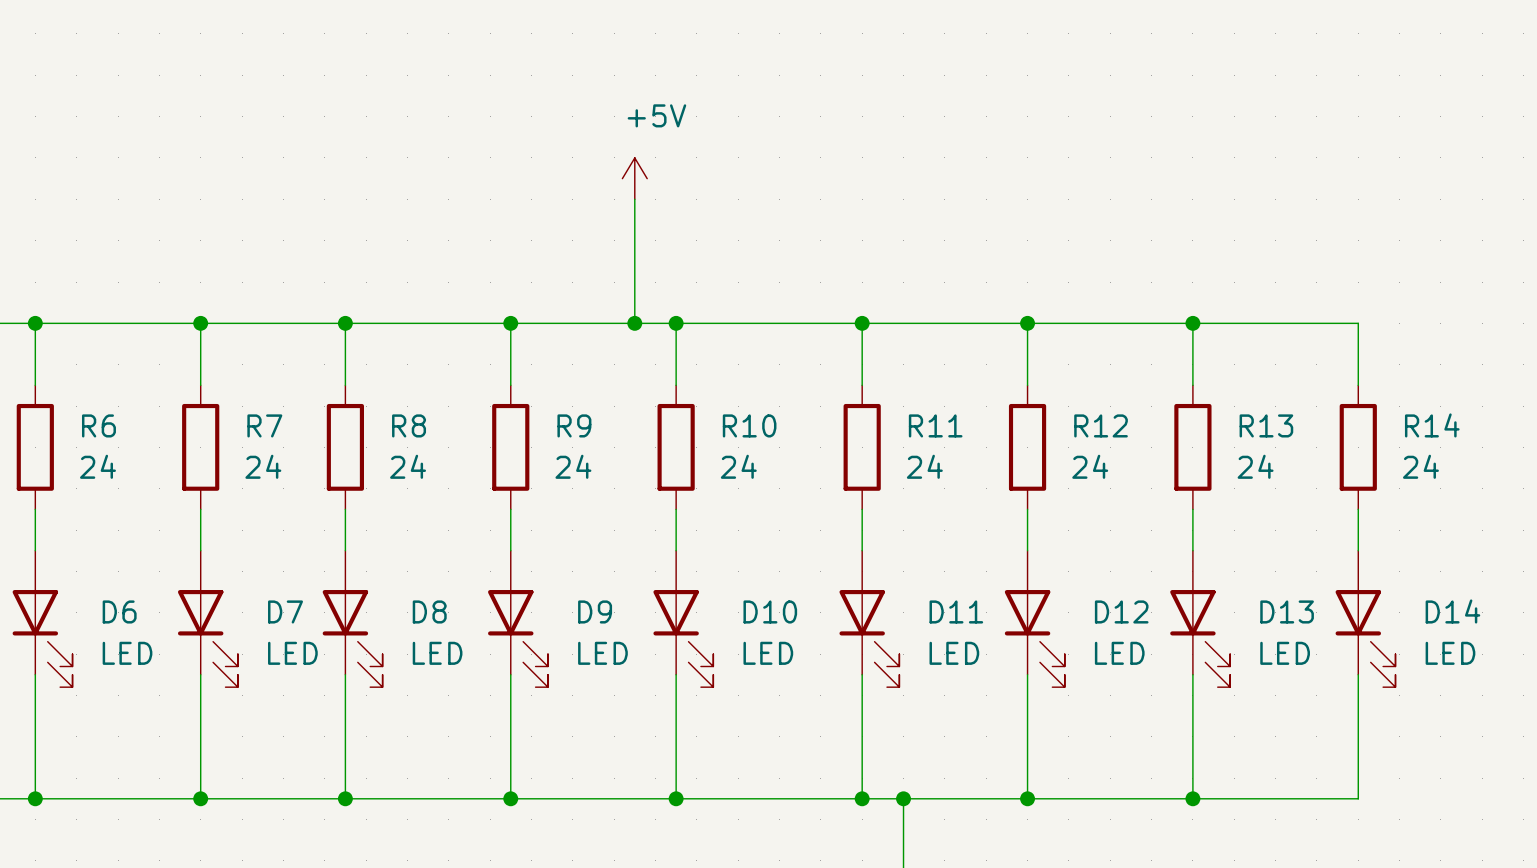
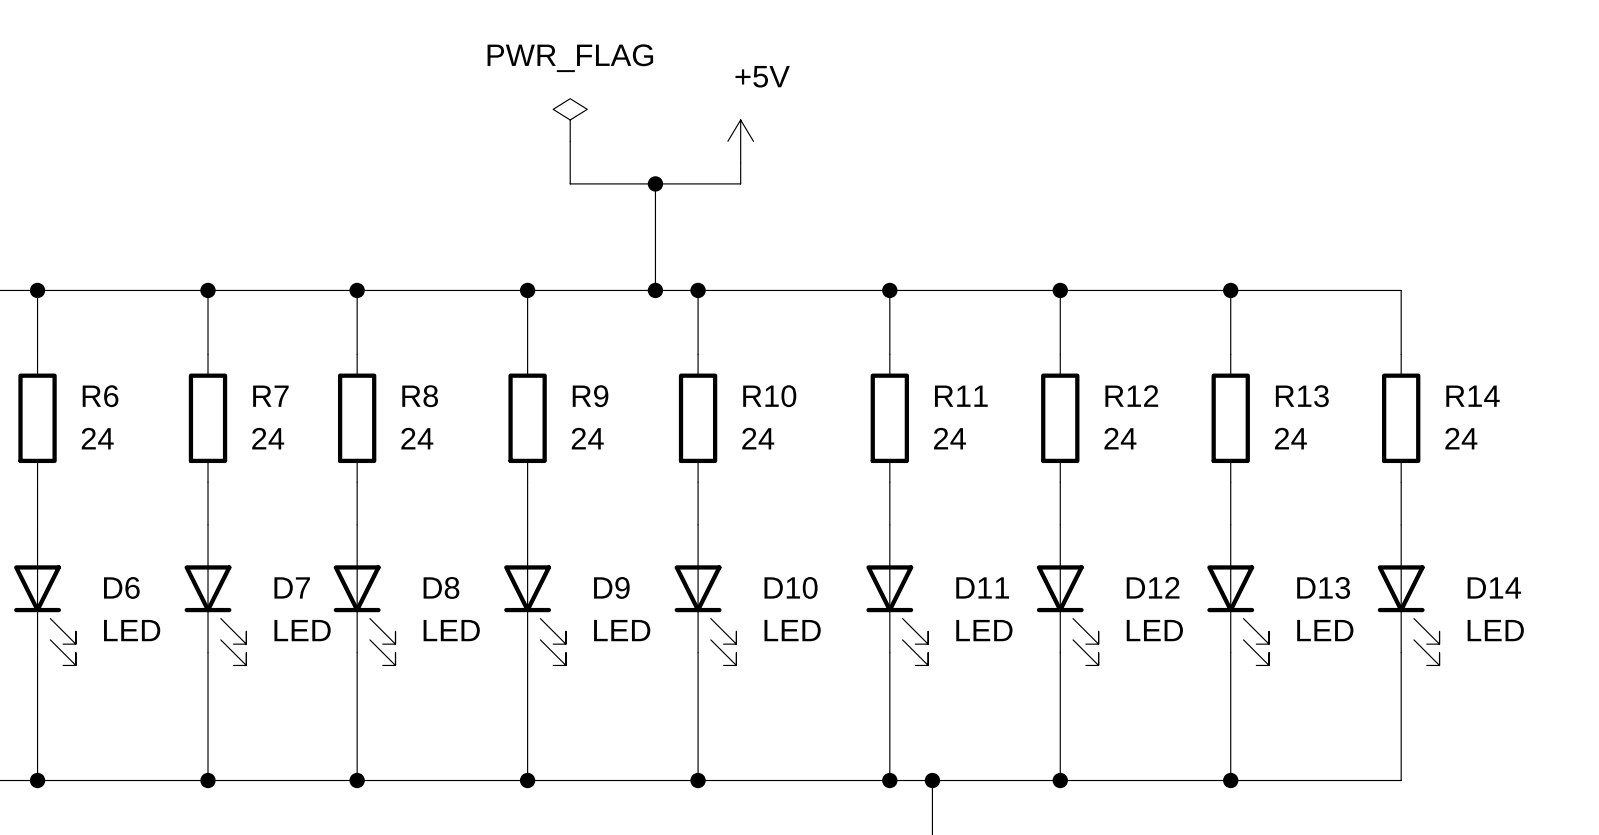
power symbol: none -> PWR_FLAG (570, 120)
wire: none -> (570, 141) (570, 183) (740, 183) (740, 162)
power symbol position: +5V (634, 178) -> +5V (740, 141)
wire: (634, 199) (634, 219) -> none
junction: none -> (655, 183)

